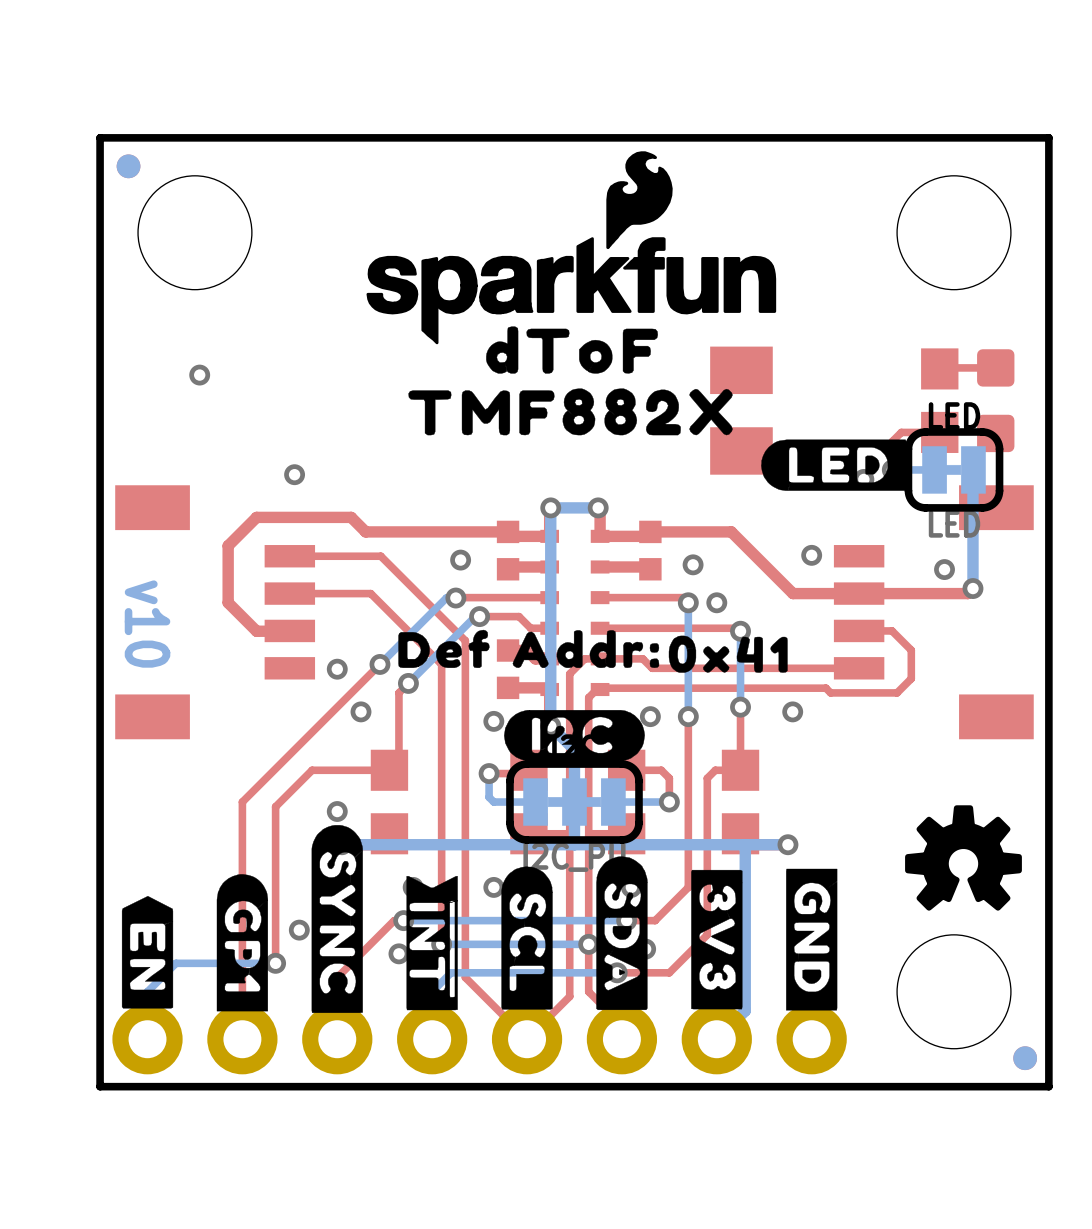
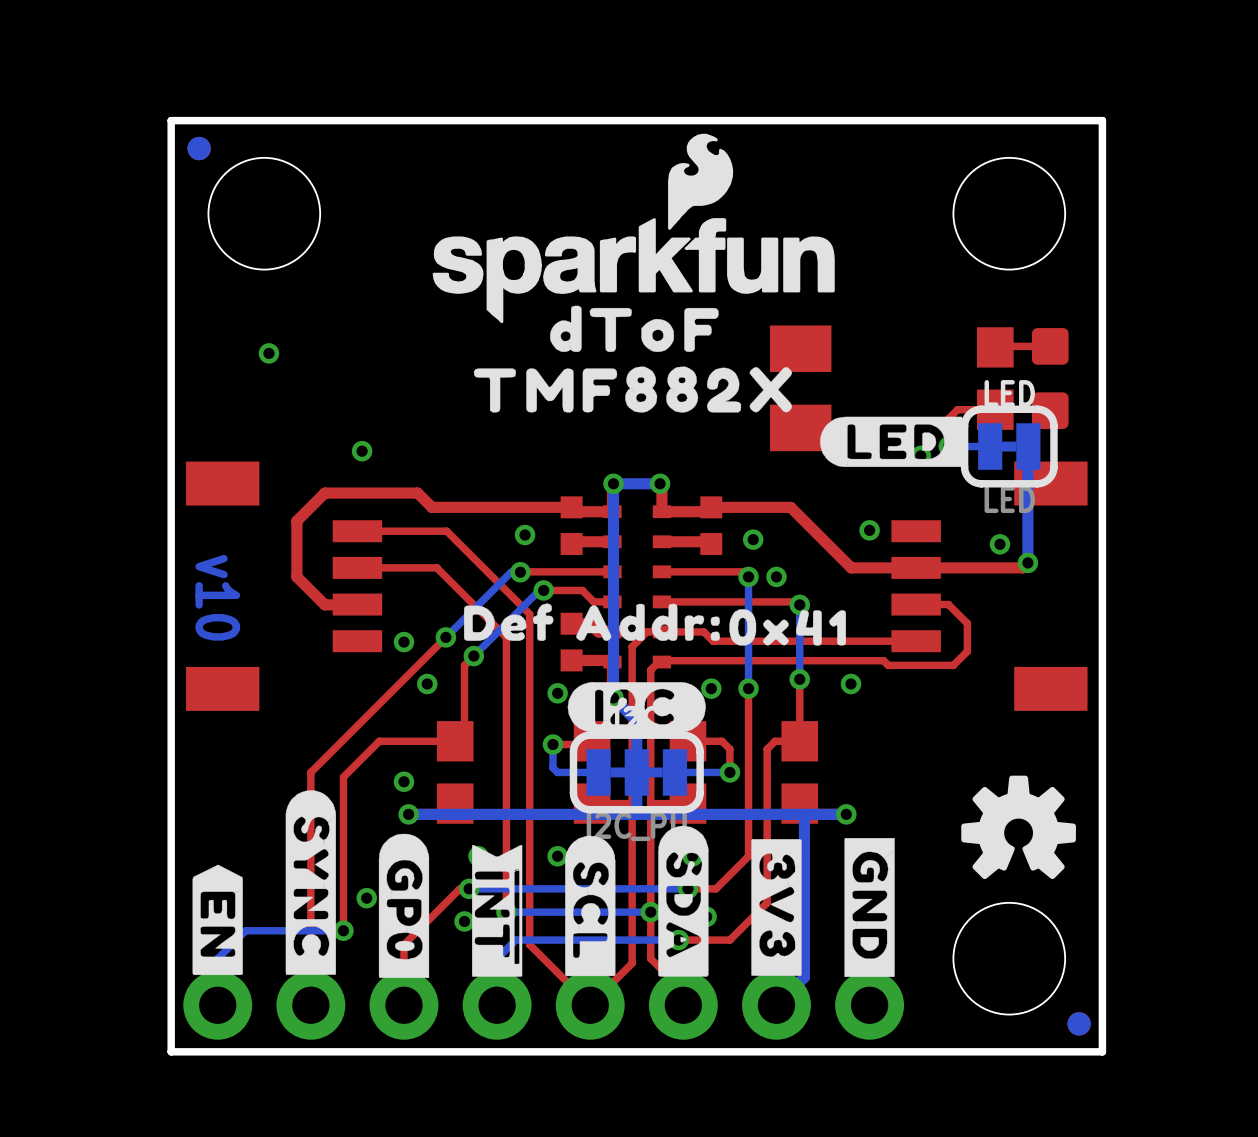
drawing: none -> [378, 833, 430, 978]
drawing: [216, 874, 268, 1012] -> none
drawing position: (337, 919) -> (310, 882)

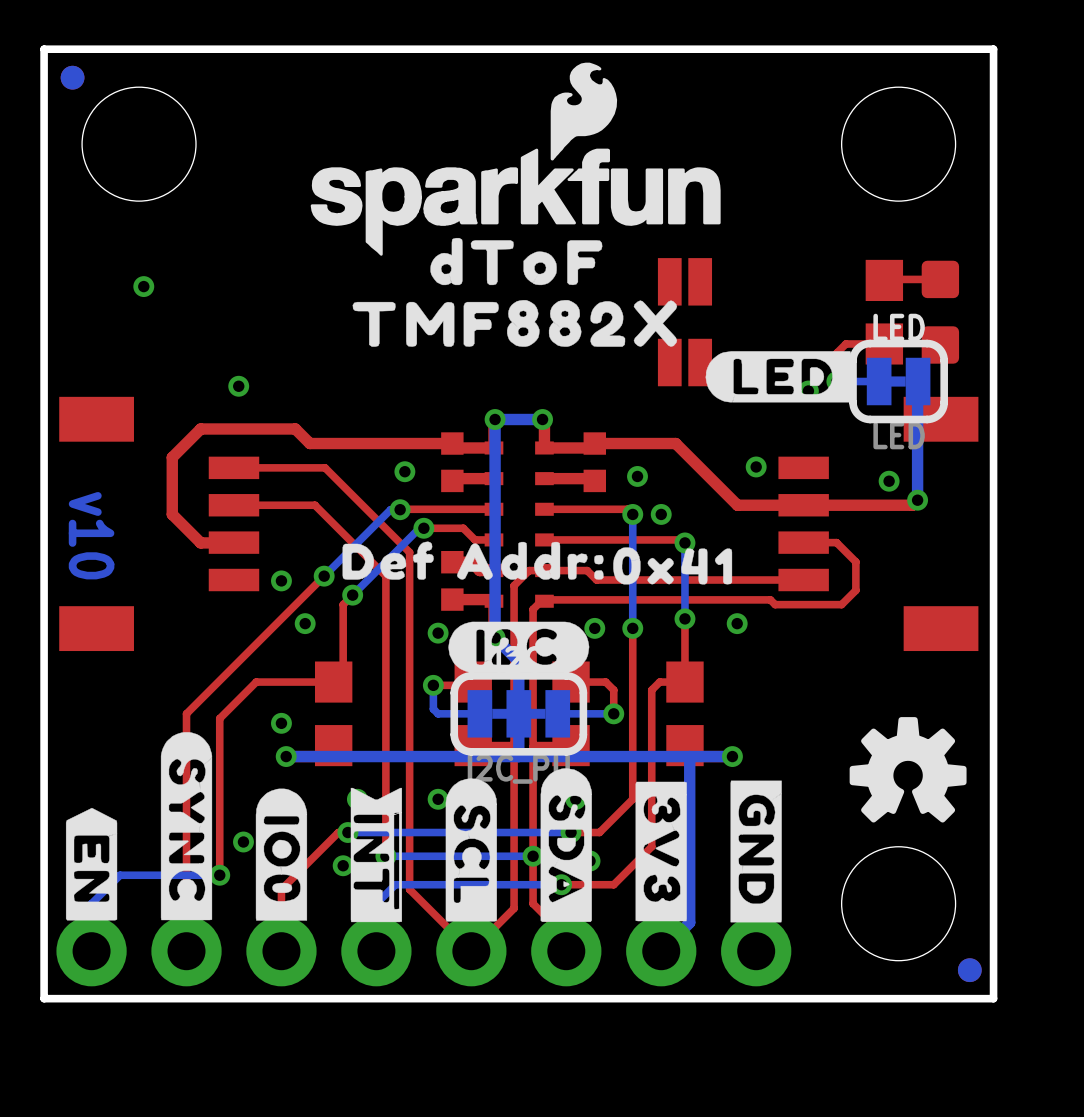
part footprint: [769, 325, 832, 373] -> [657, 258, 713, 306]
part footprint: [769, 404, 832, 452] -> [657, 338, 713, 387]
drawing shape: [378, 833, 430, 978] -> [255, 788, 308, 921]

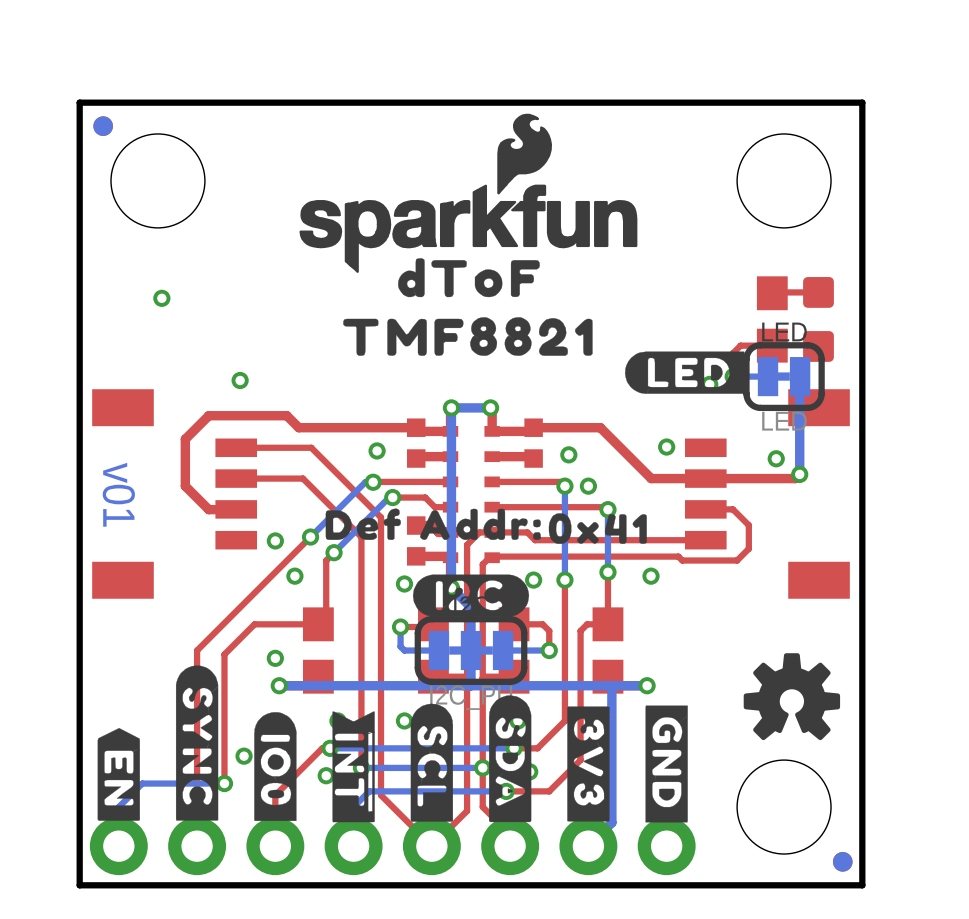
part: (684, 281) -> none
drawing shape: [352, 300, 678, 347] -> [343, 317, 593, 356]
part: (684, 362) -> none
text: v10 (91, 535) -> v01 (118, 494)

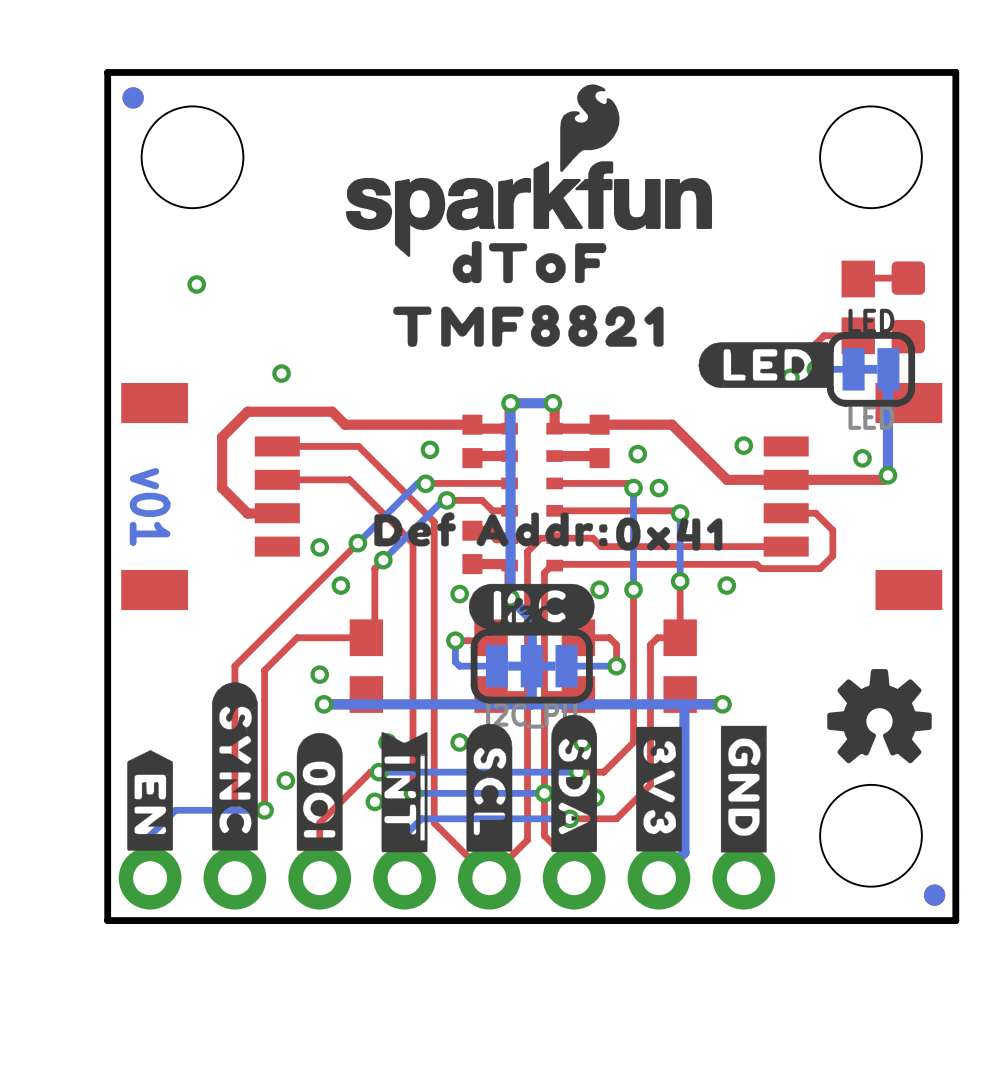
drawing shape: [254, 712, 297, 821] -> [296, 732, 343, 851]

